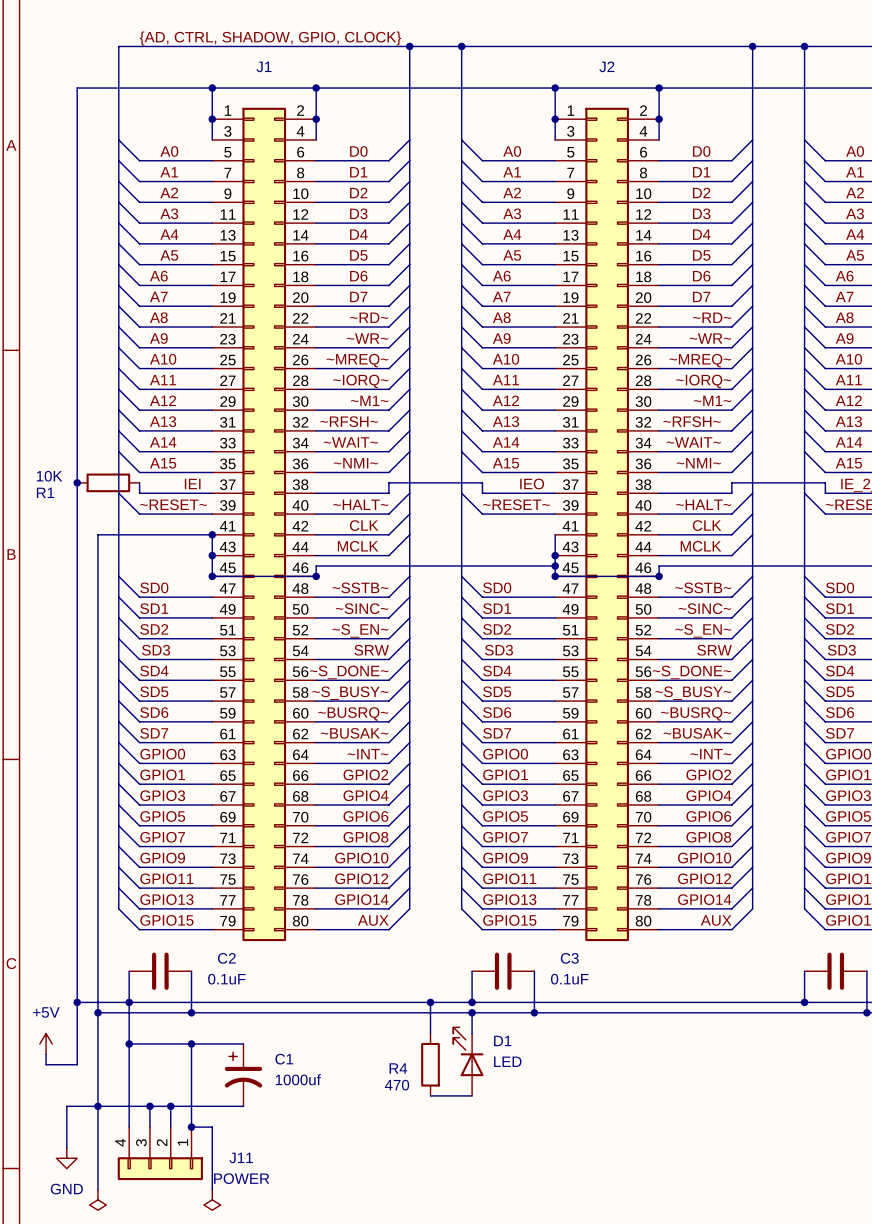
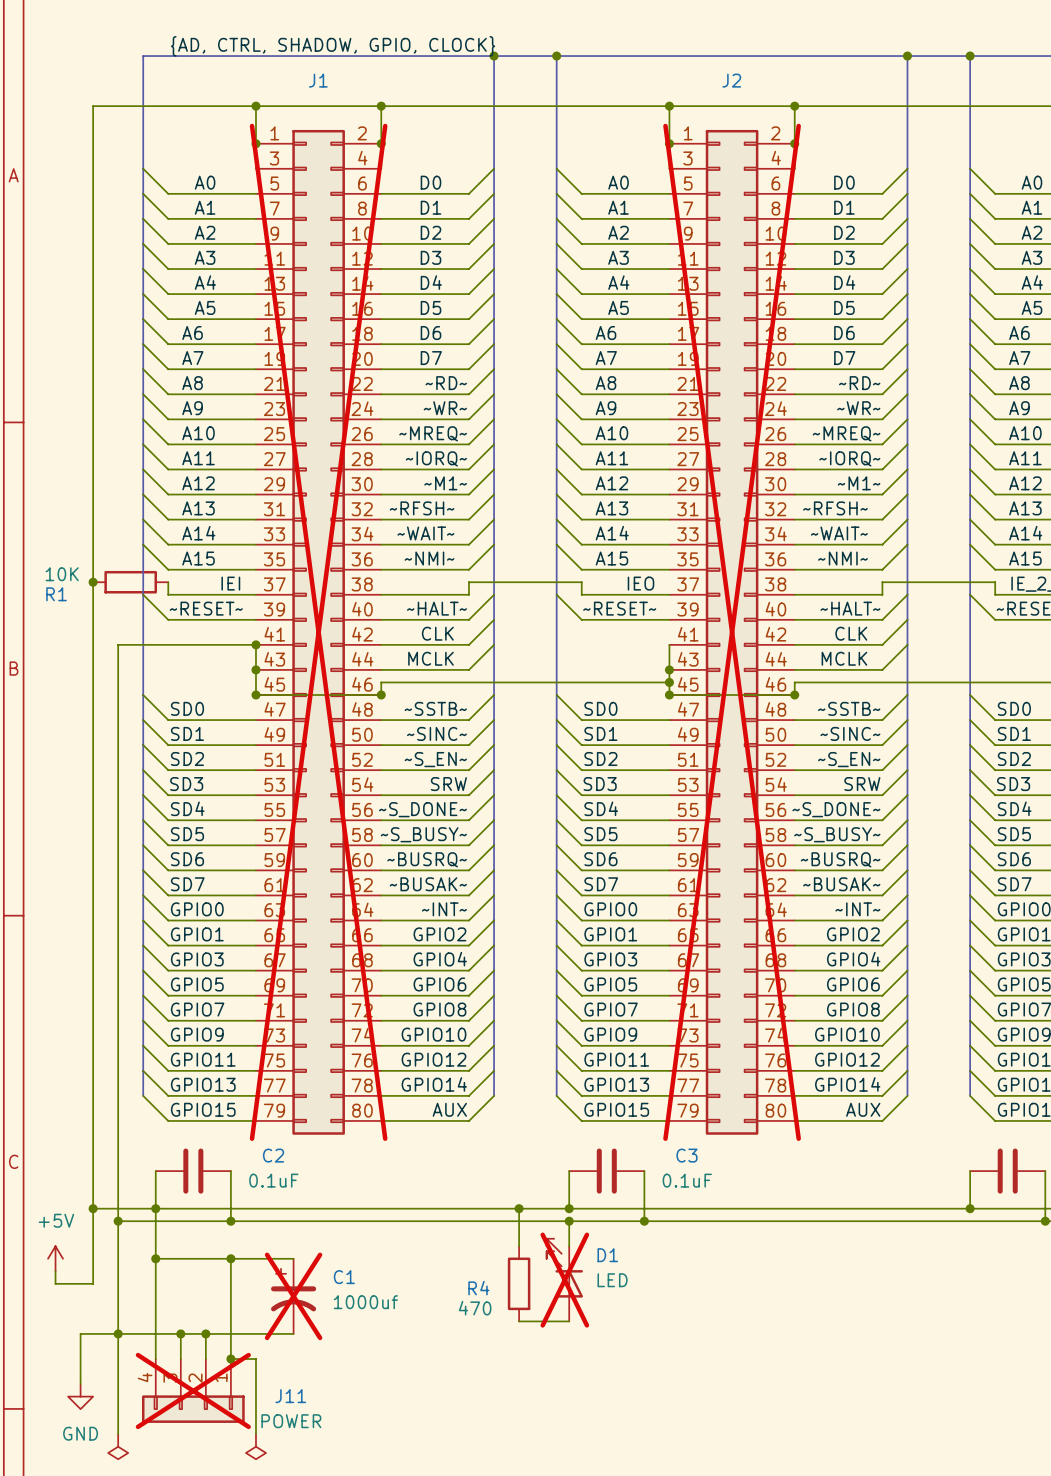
J1 do-not-place cross: none -> (318, 632)
J2 do-not-place cross: none -> (732, 632)
D1 do-not-place cross: none -> (564, 1280)
C1 do-not-place cross: none -> (293, 1296)
J11 do-not-place cross: none -> (193, 1390)

